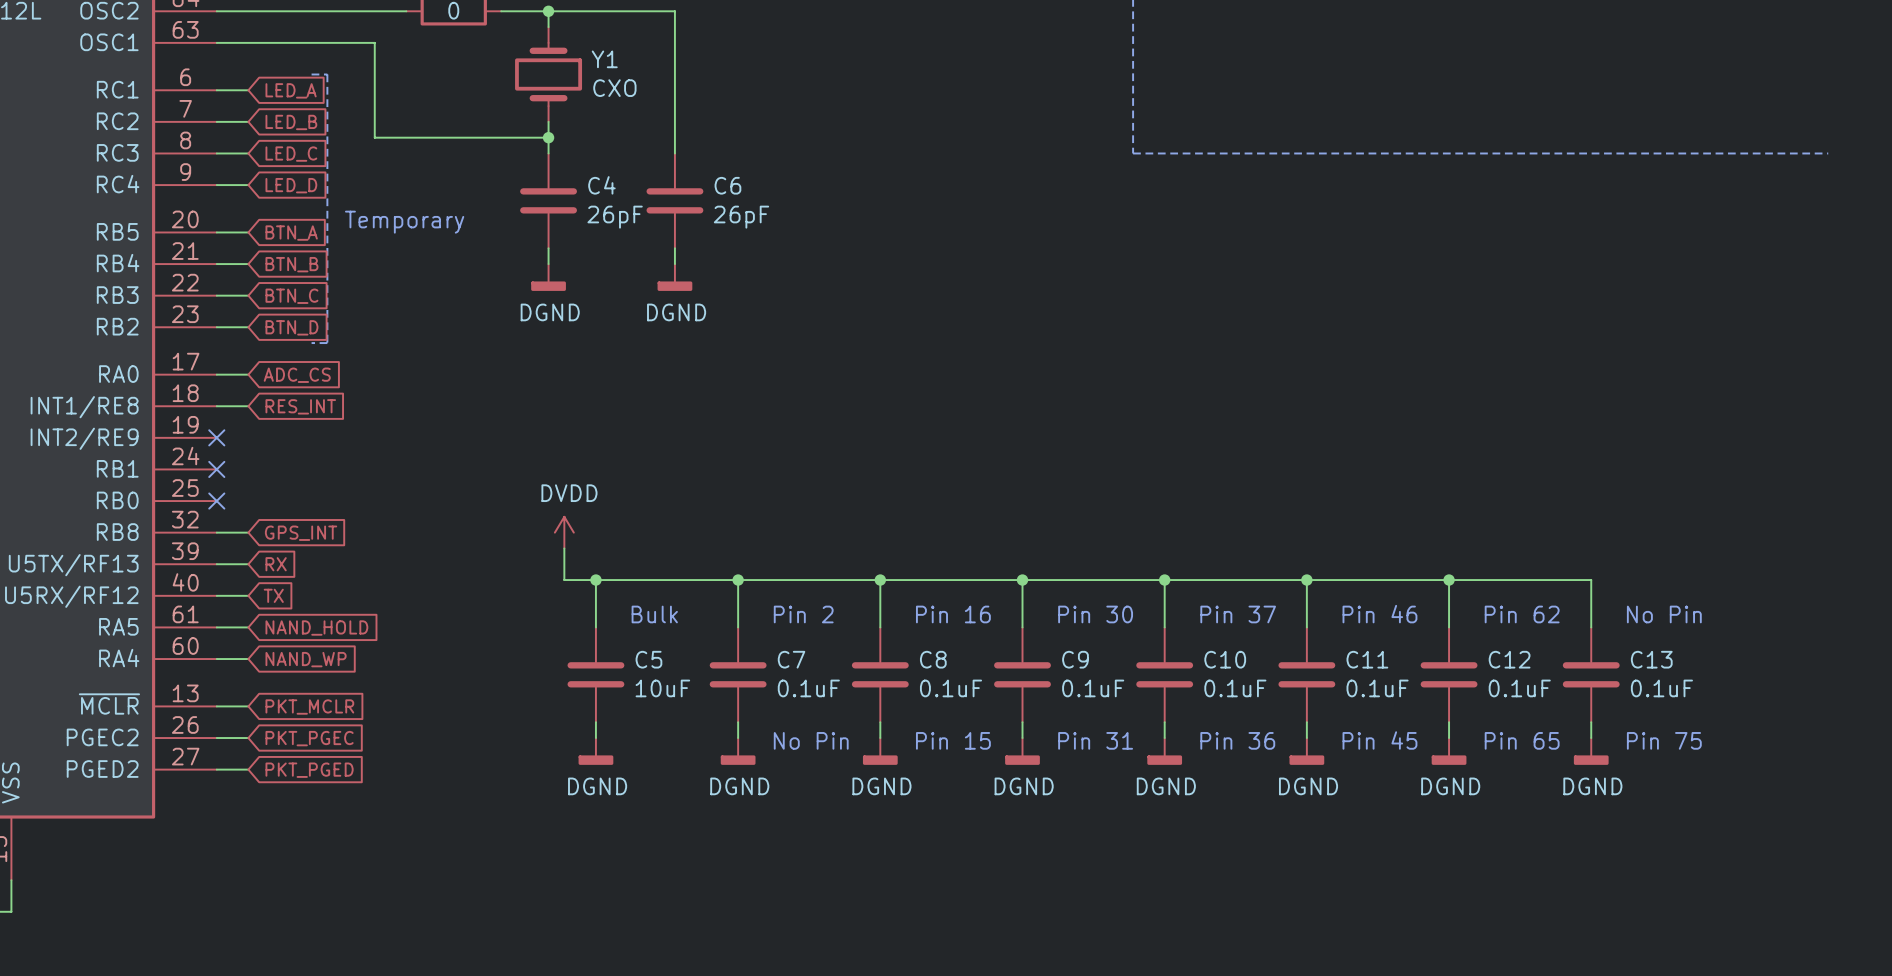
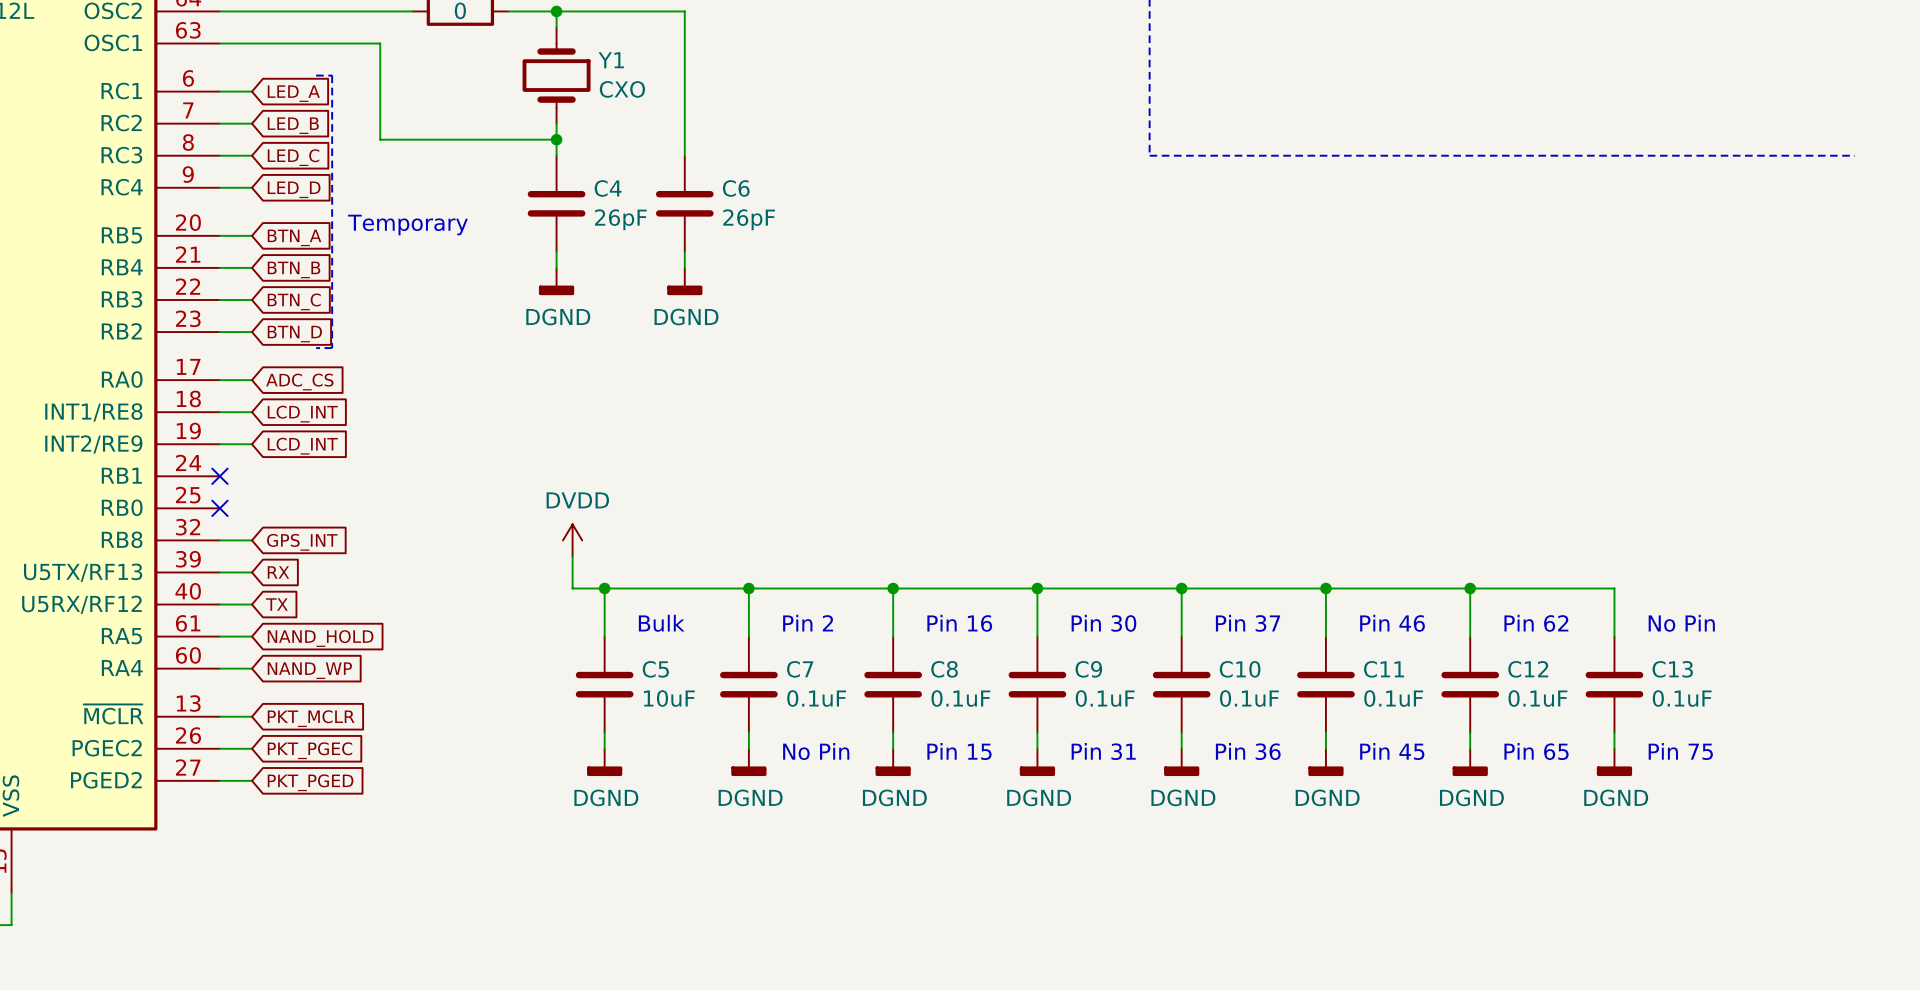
global label: RES_INT (300, 406) -> LCD_INT (302, 414)
wire: none -> (219, 444) (252, 444)
no-connect mark: (216, 437) -> none
global label: none -> LCD_INT (302, 446)

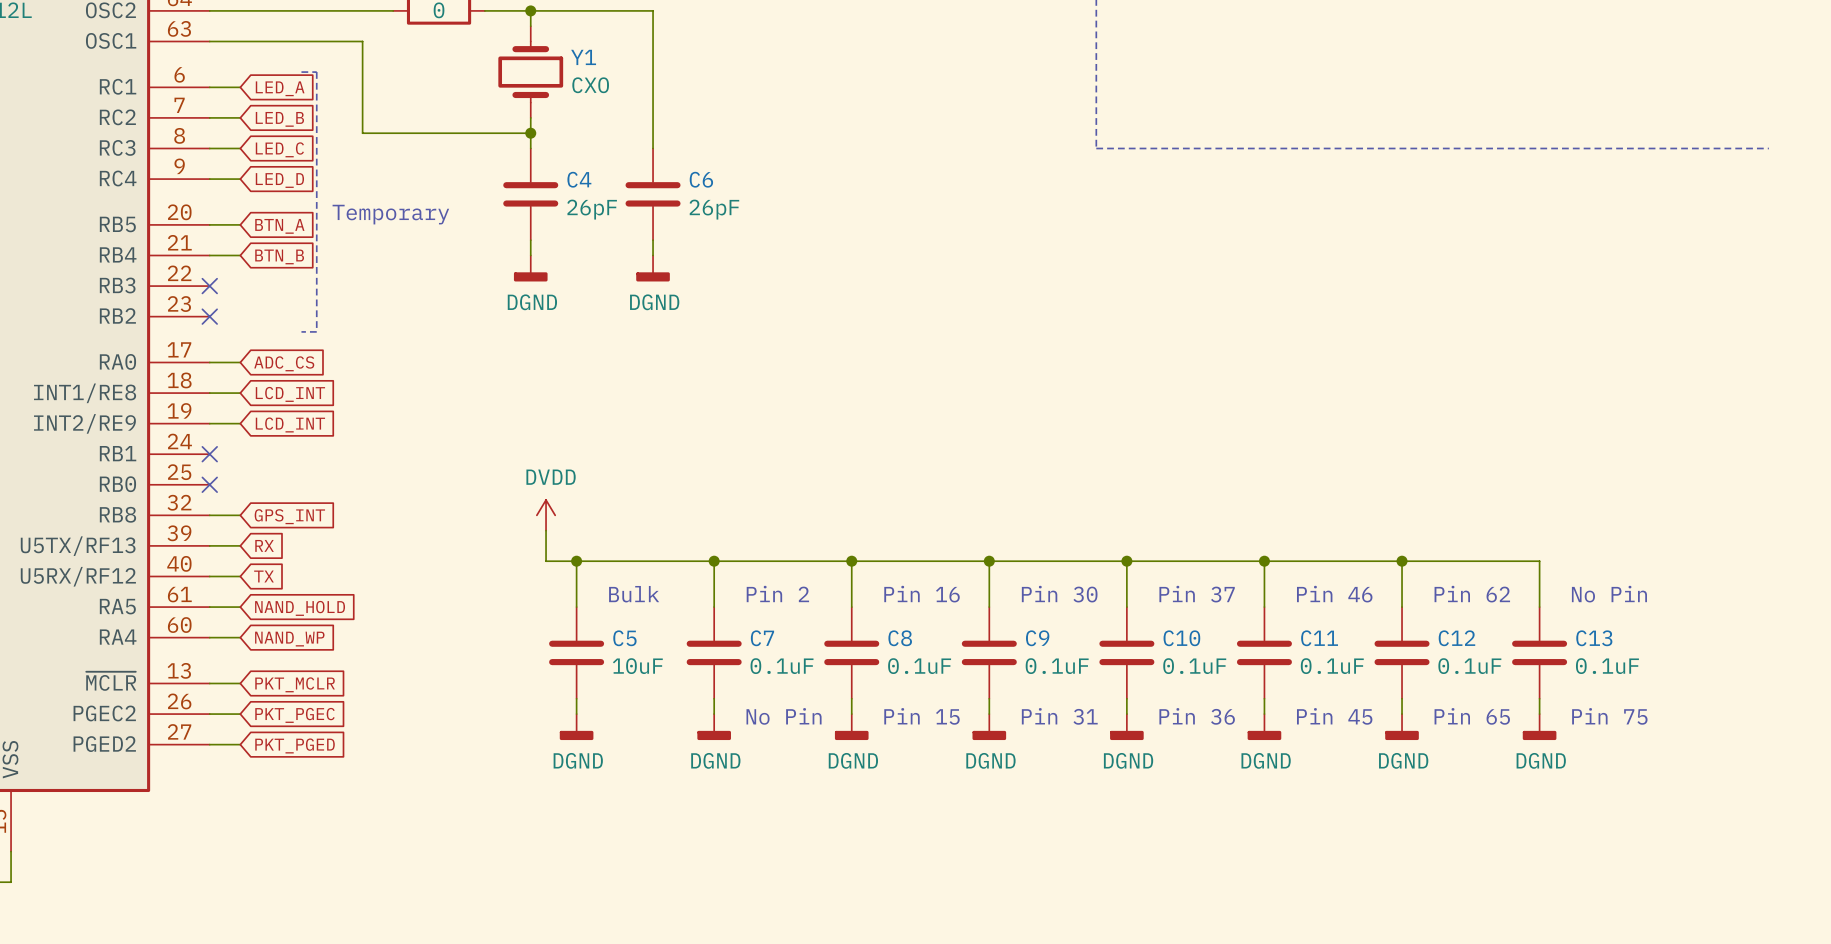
wire: (219, 299) (252, 299) -> none
no-connect mark: none -> (209, 286)
global label: BTN_C (294, 301) -> none
wire: (219, 332) (252, 332) -> none
no-connect mark: none -> (209, 316)
global label: BTN_D (294, 334) -> none

